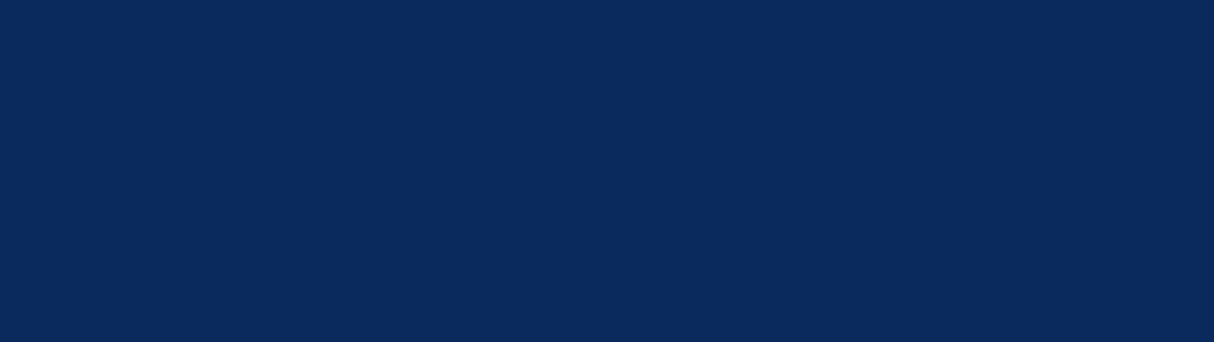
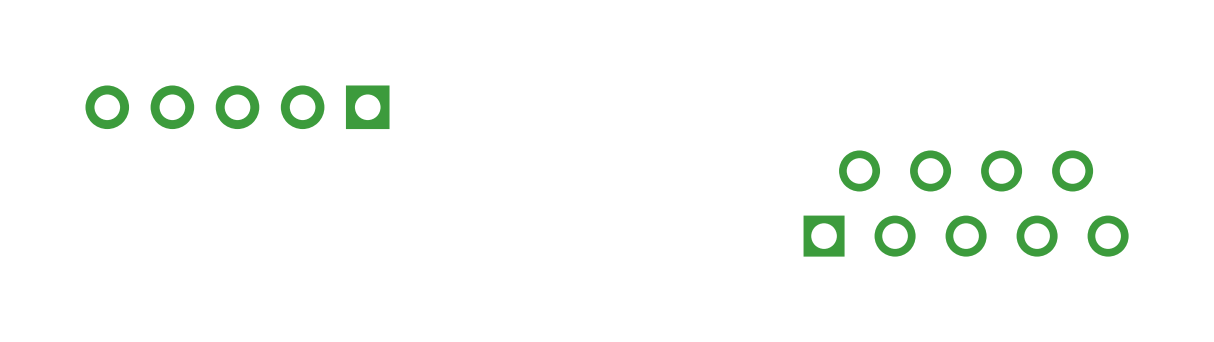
part: none -> (237, 107)
part: none -> (966, 203)

